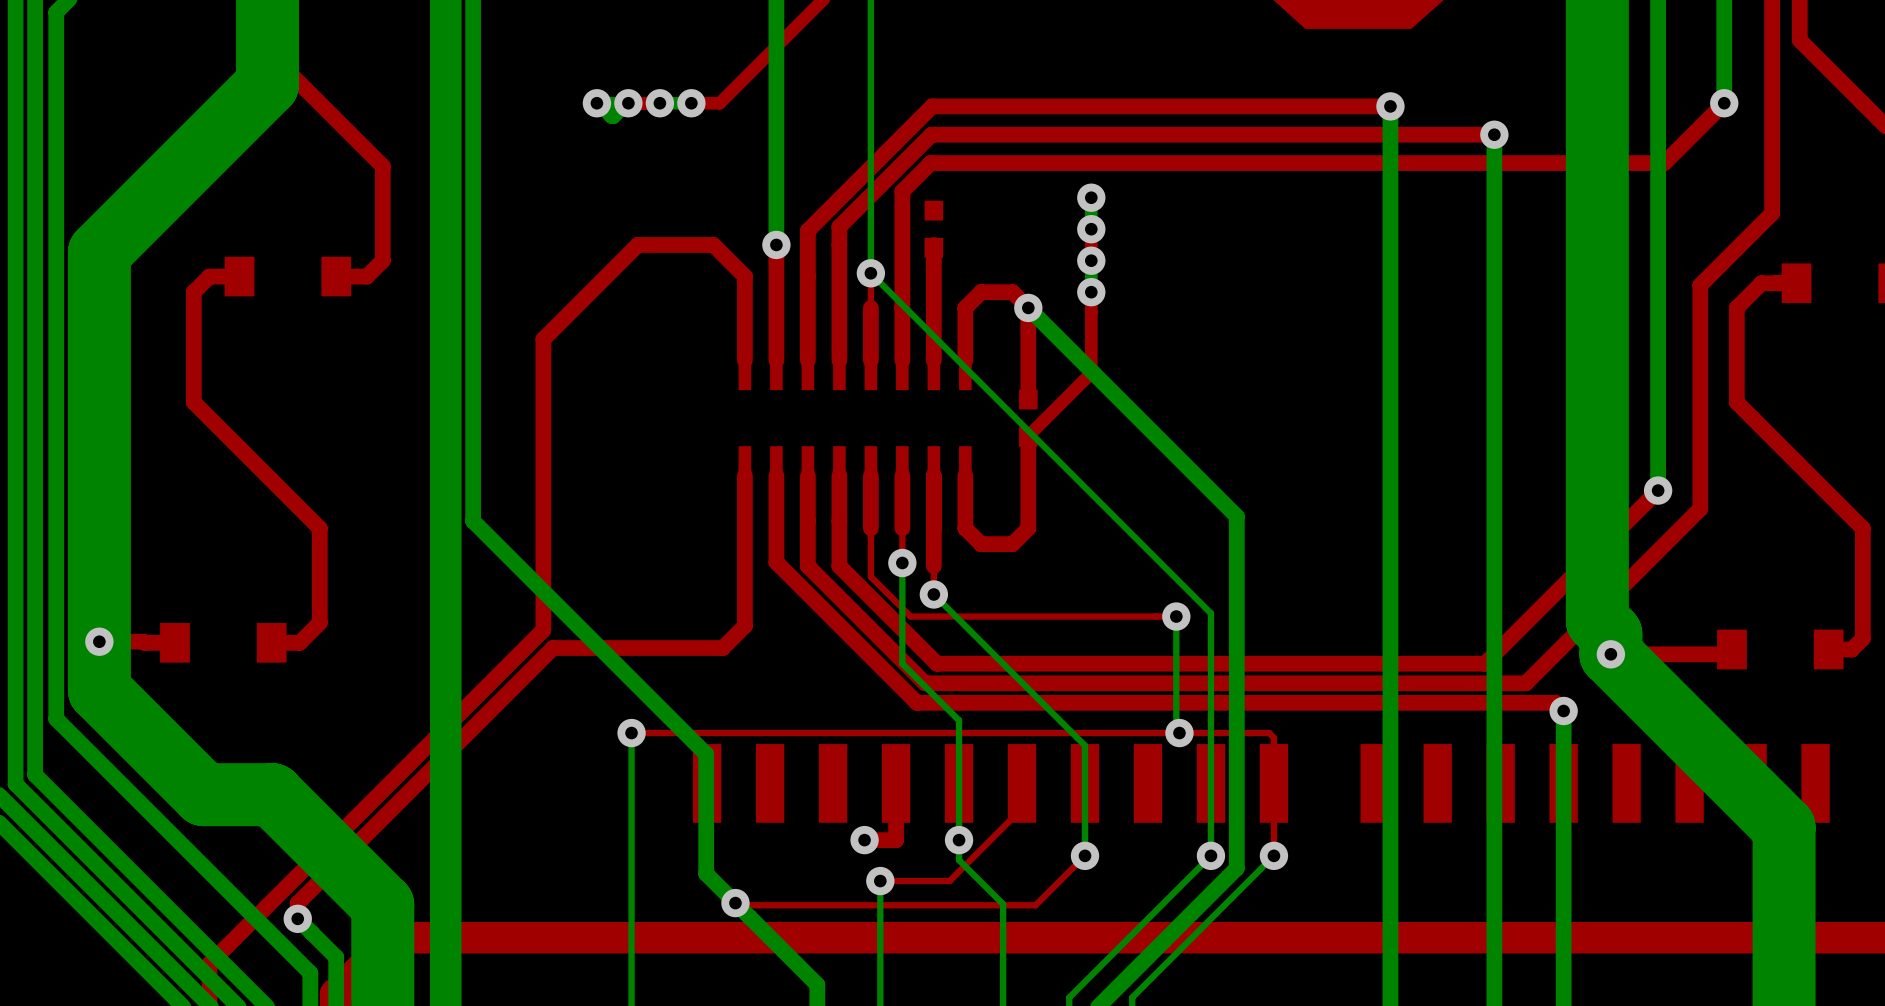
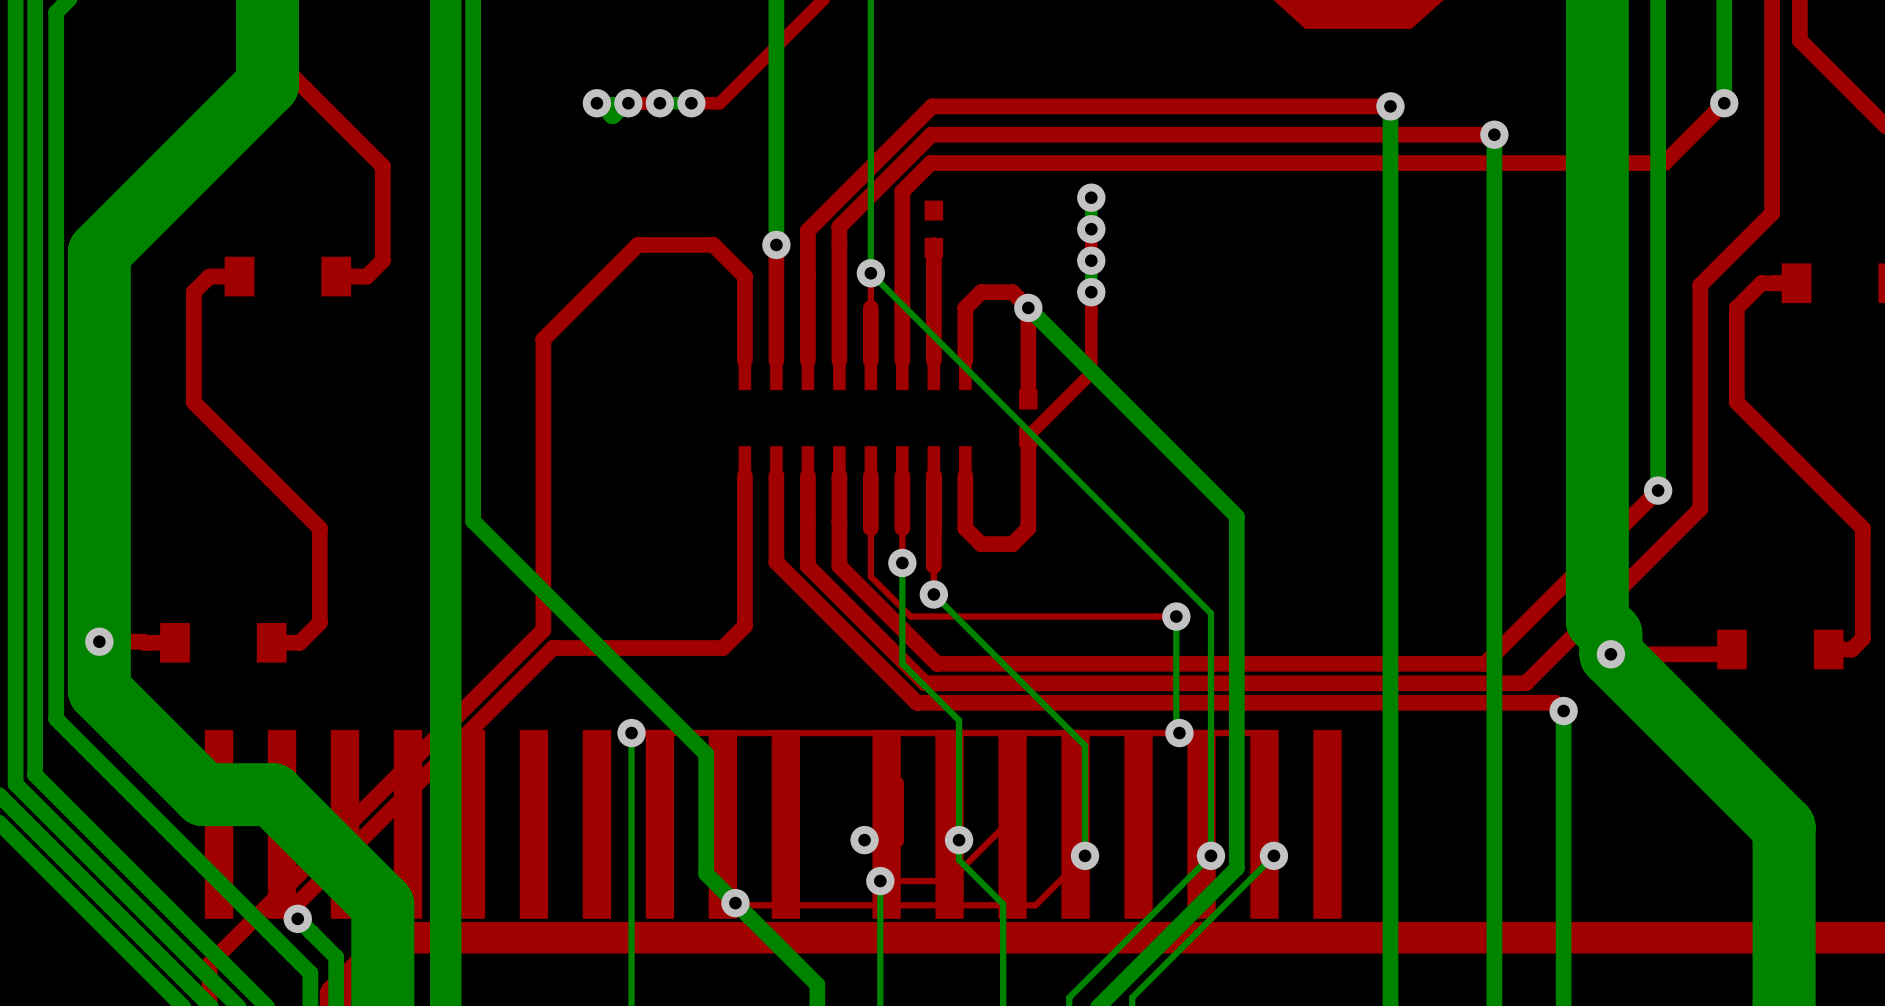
part: (990, 783) -> none
part: (1595, 783) -> none
part: none -> (502, 824)
part: none -> (1107, 824)

